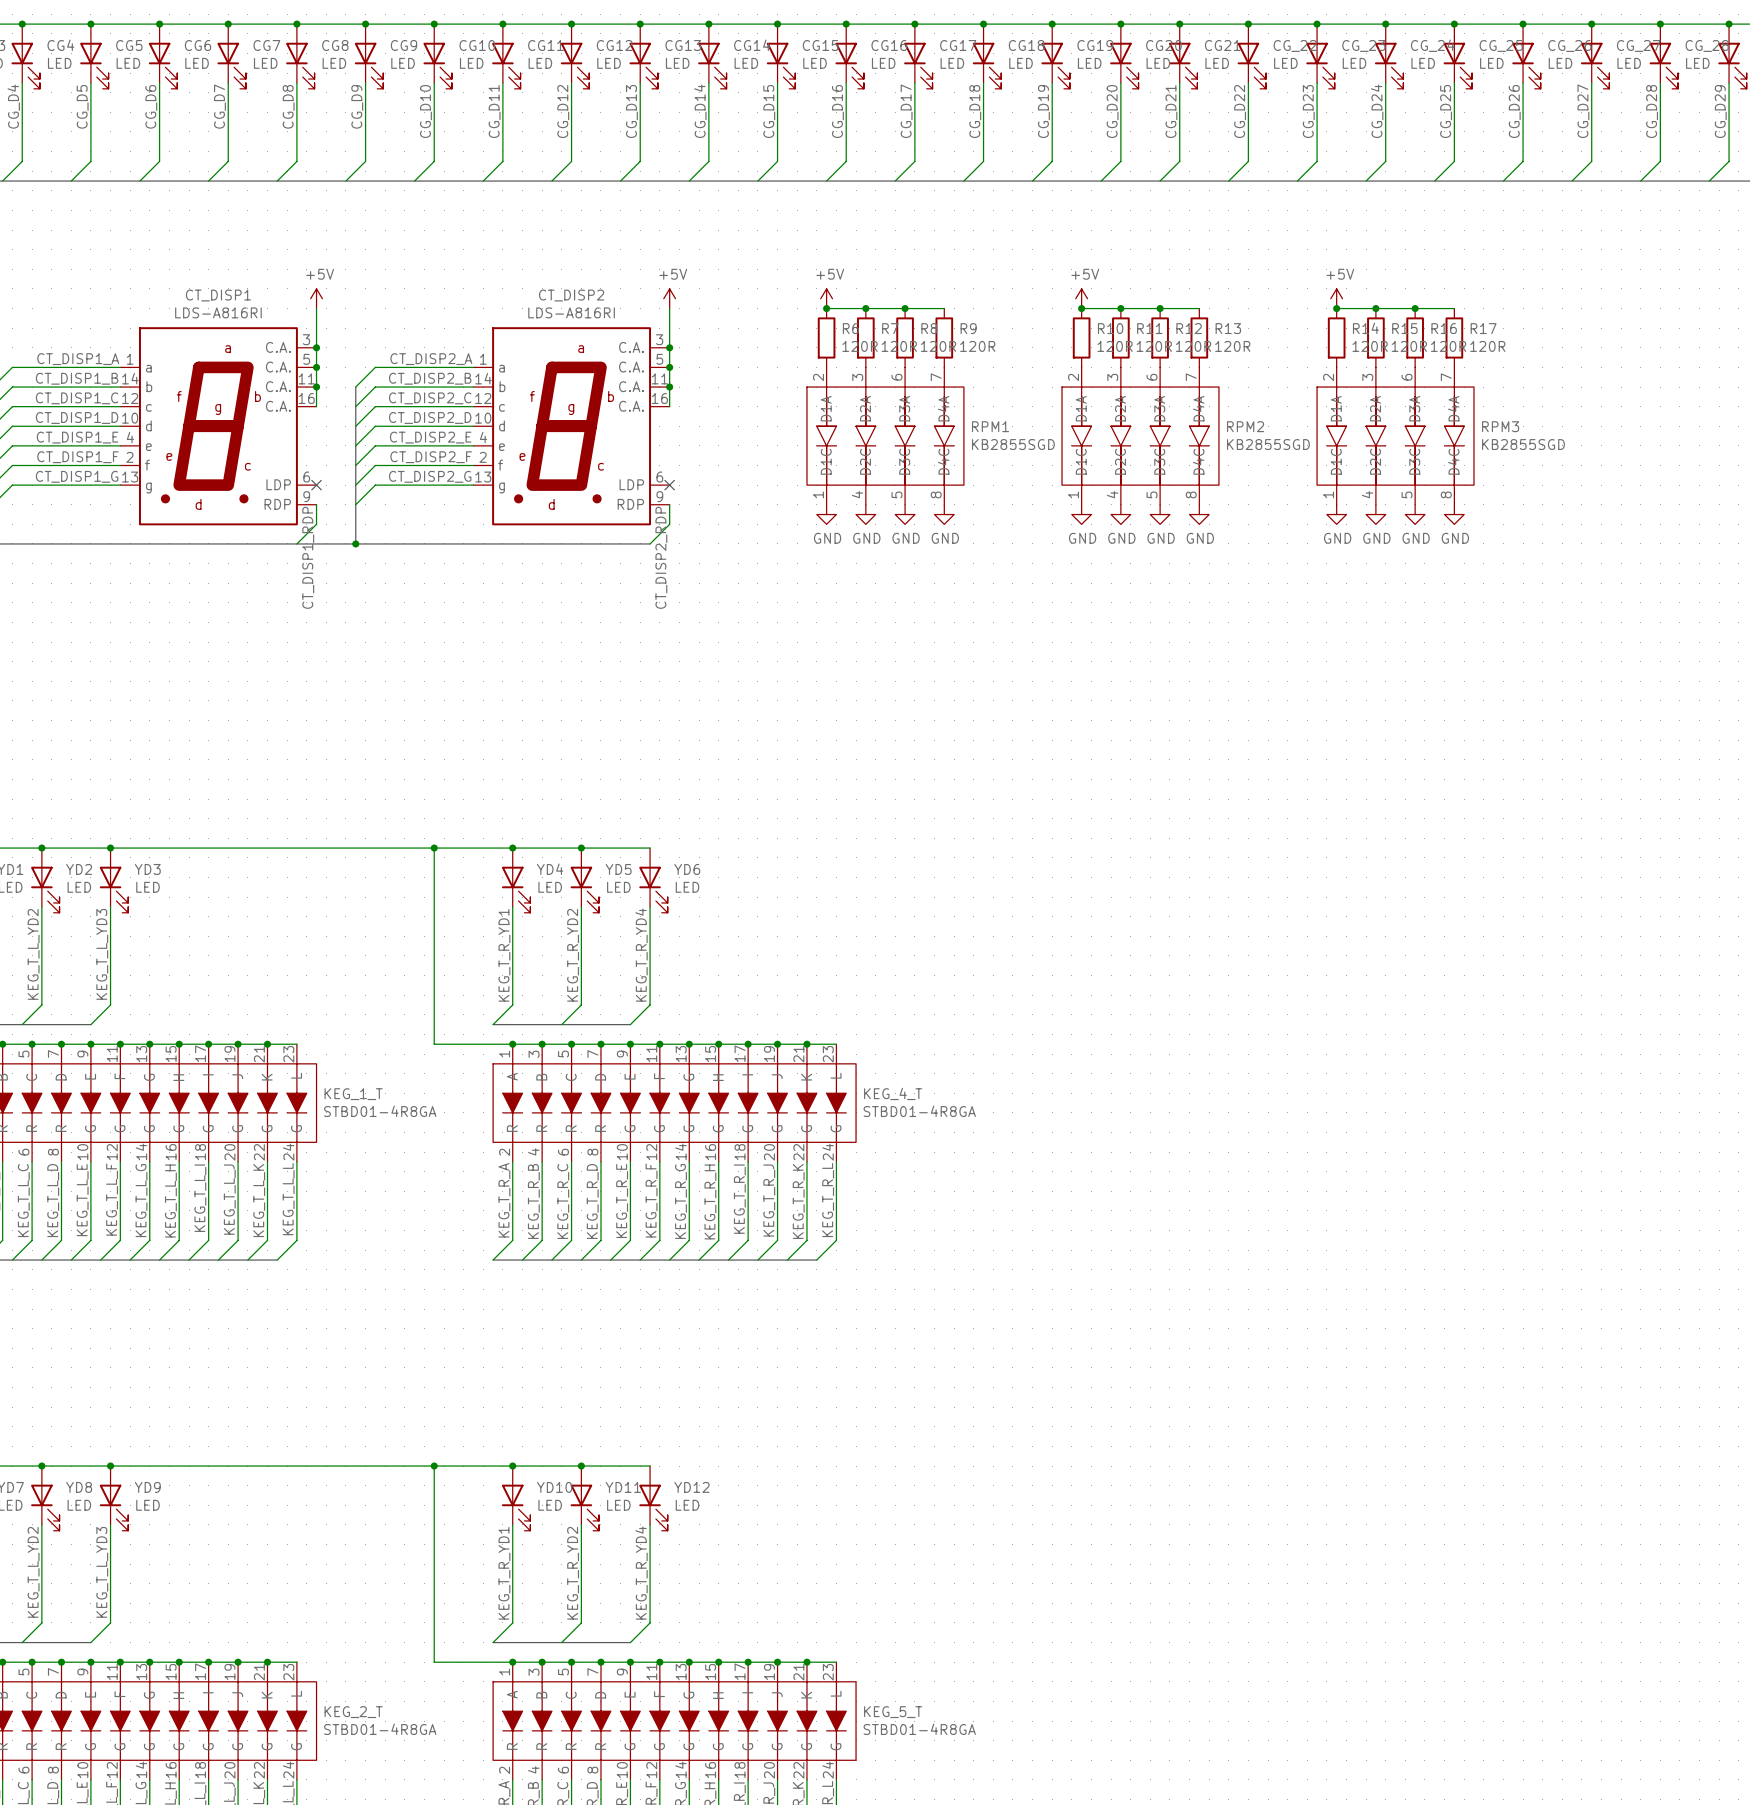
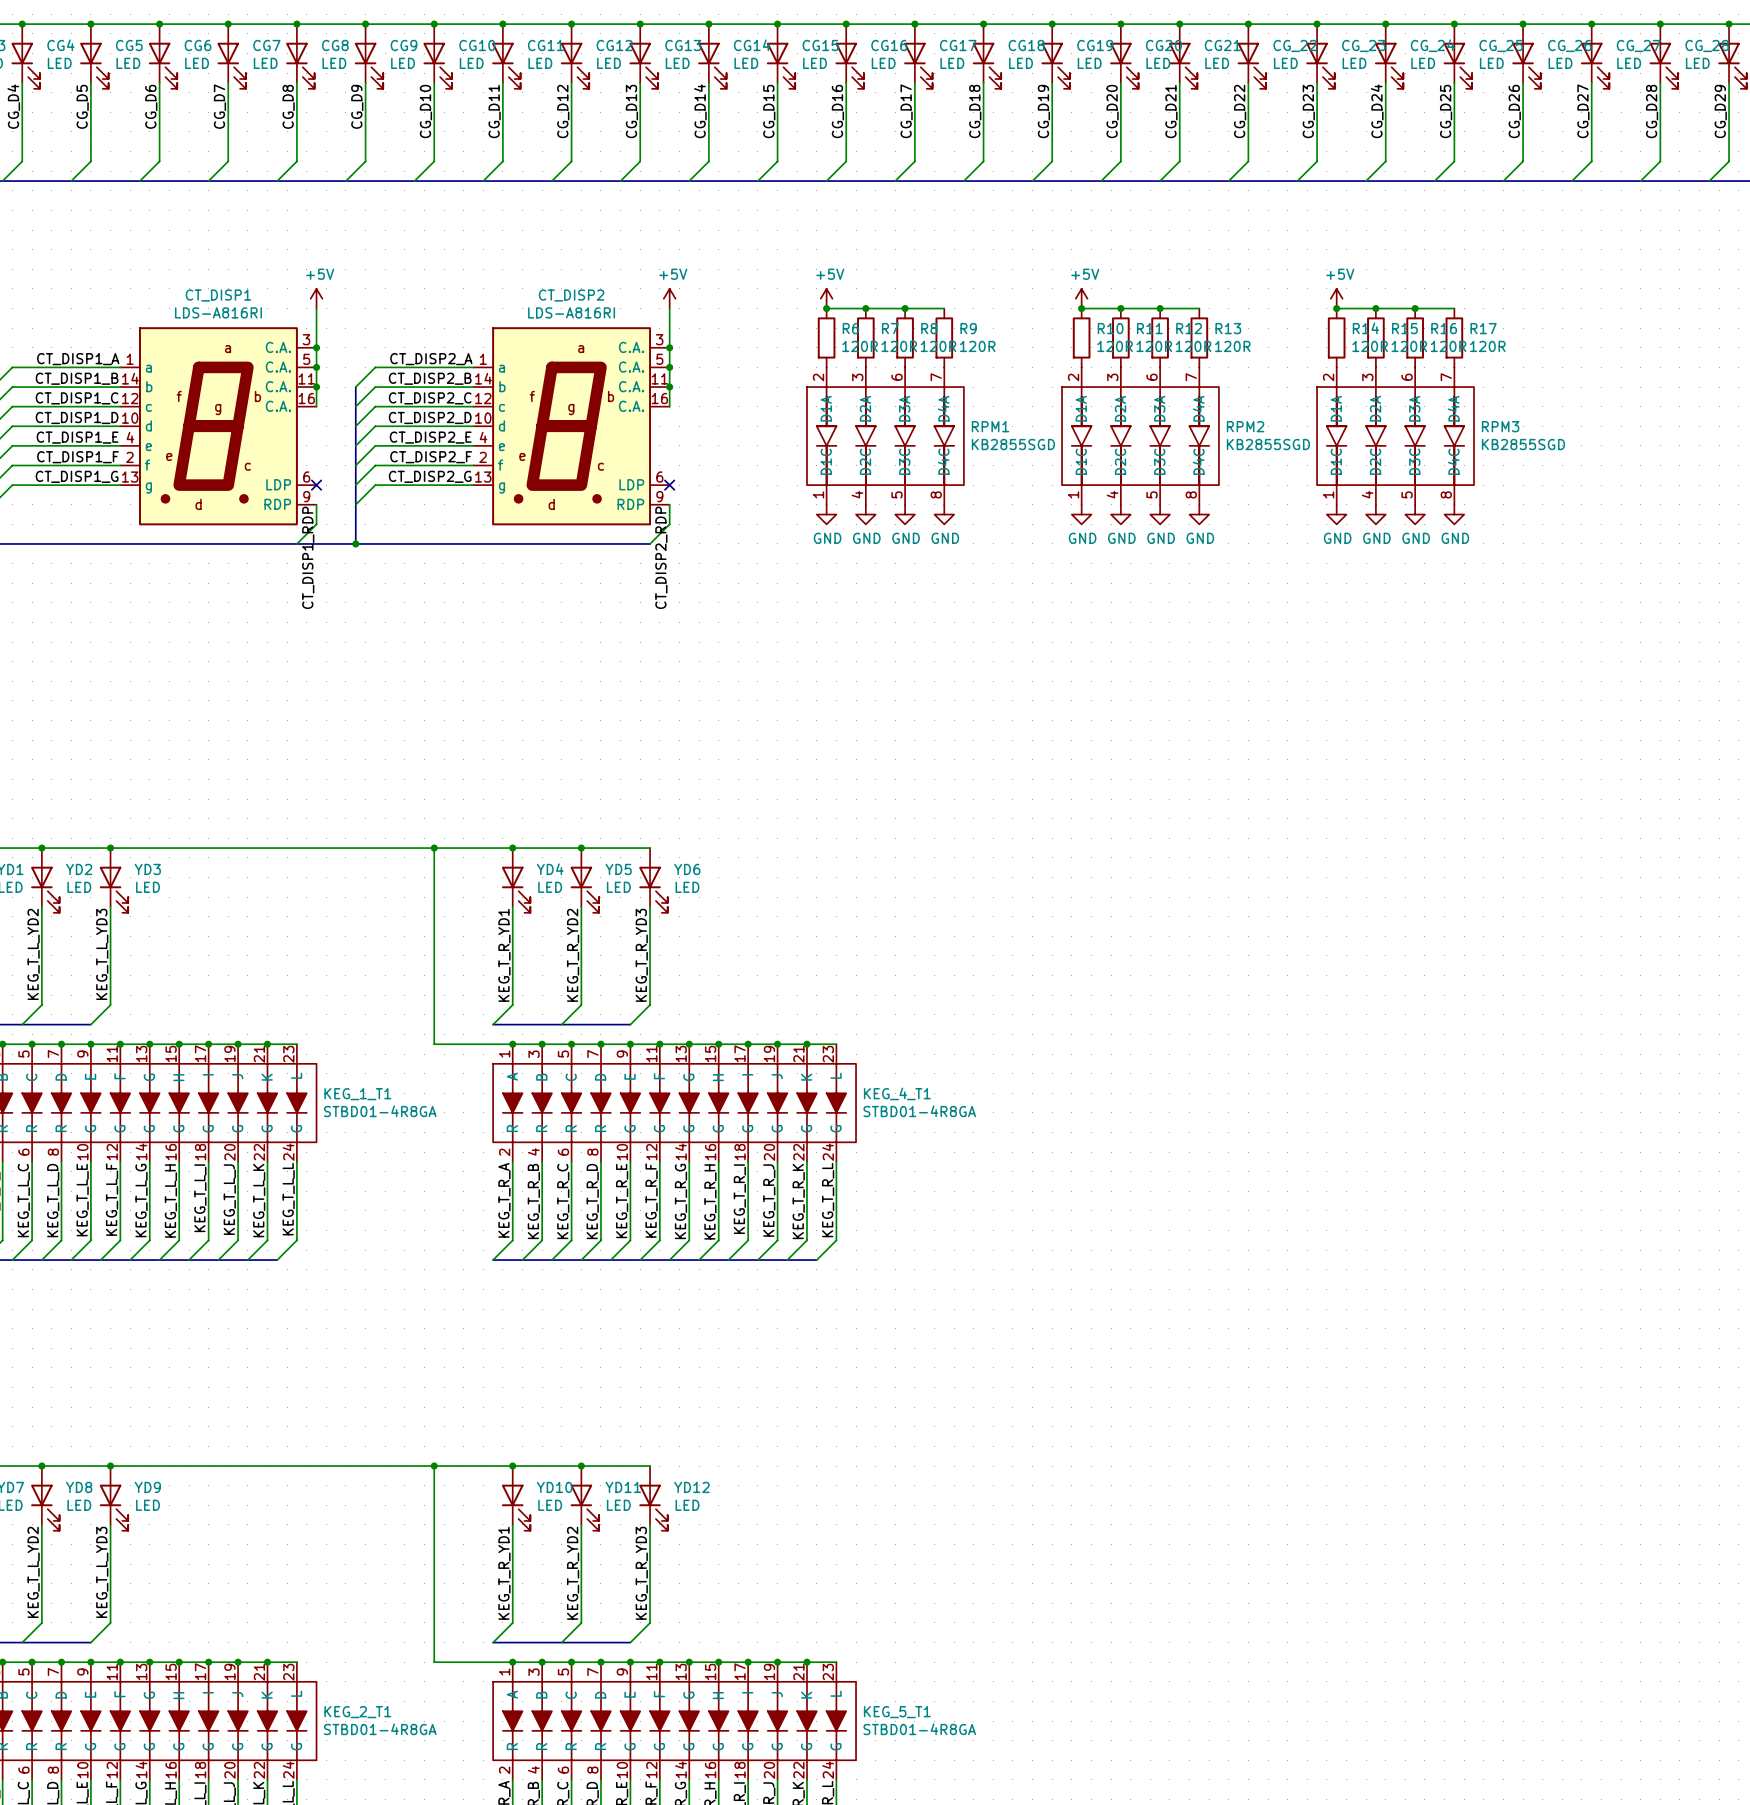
label: KEG_T_R_YD4 (641, 955) -> KEG_T_R_YD3 (641, 955)
KEG_4_T name: KEG_4_T (893, 1093) -> KEG_4_T1 (897, 1093)
KEG_1_T name: KEG_1_T (353, 1094) -> KEG_1_T1 (357, 1094)
label: KEG_T_R_YD4 (641, 1573) -> KEG_T_R_YD3 (641, 1573)
KEG_2_T name: KEG_2_T (353, 1712) -> KEG_2_T1 (357, 1712)
KEG_5_T name: KEG_5_T (893, 1712) -> KEG_5_T1 (897, 1712)

